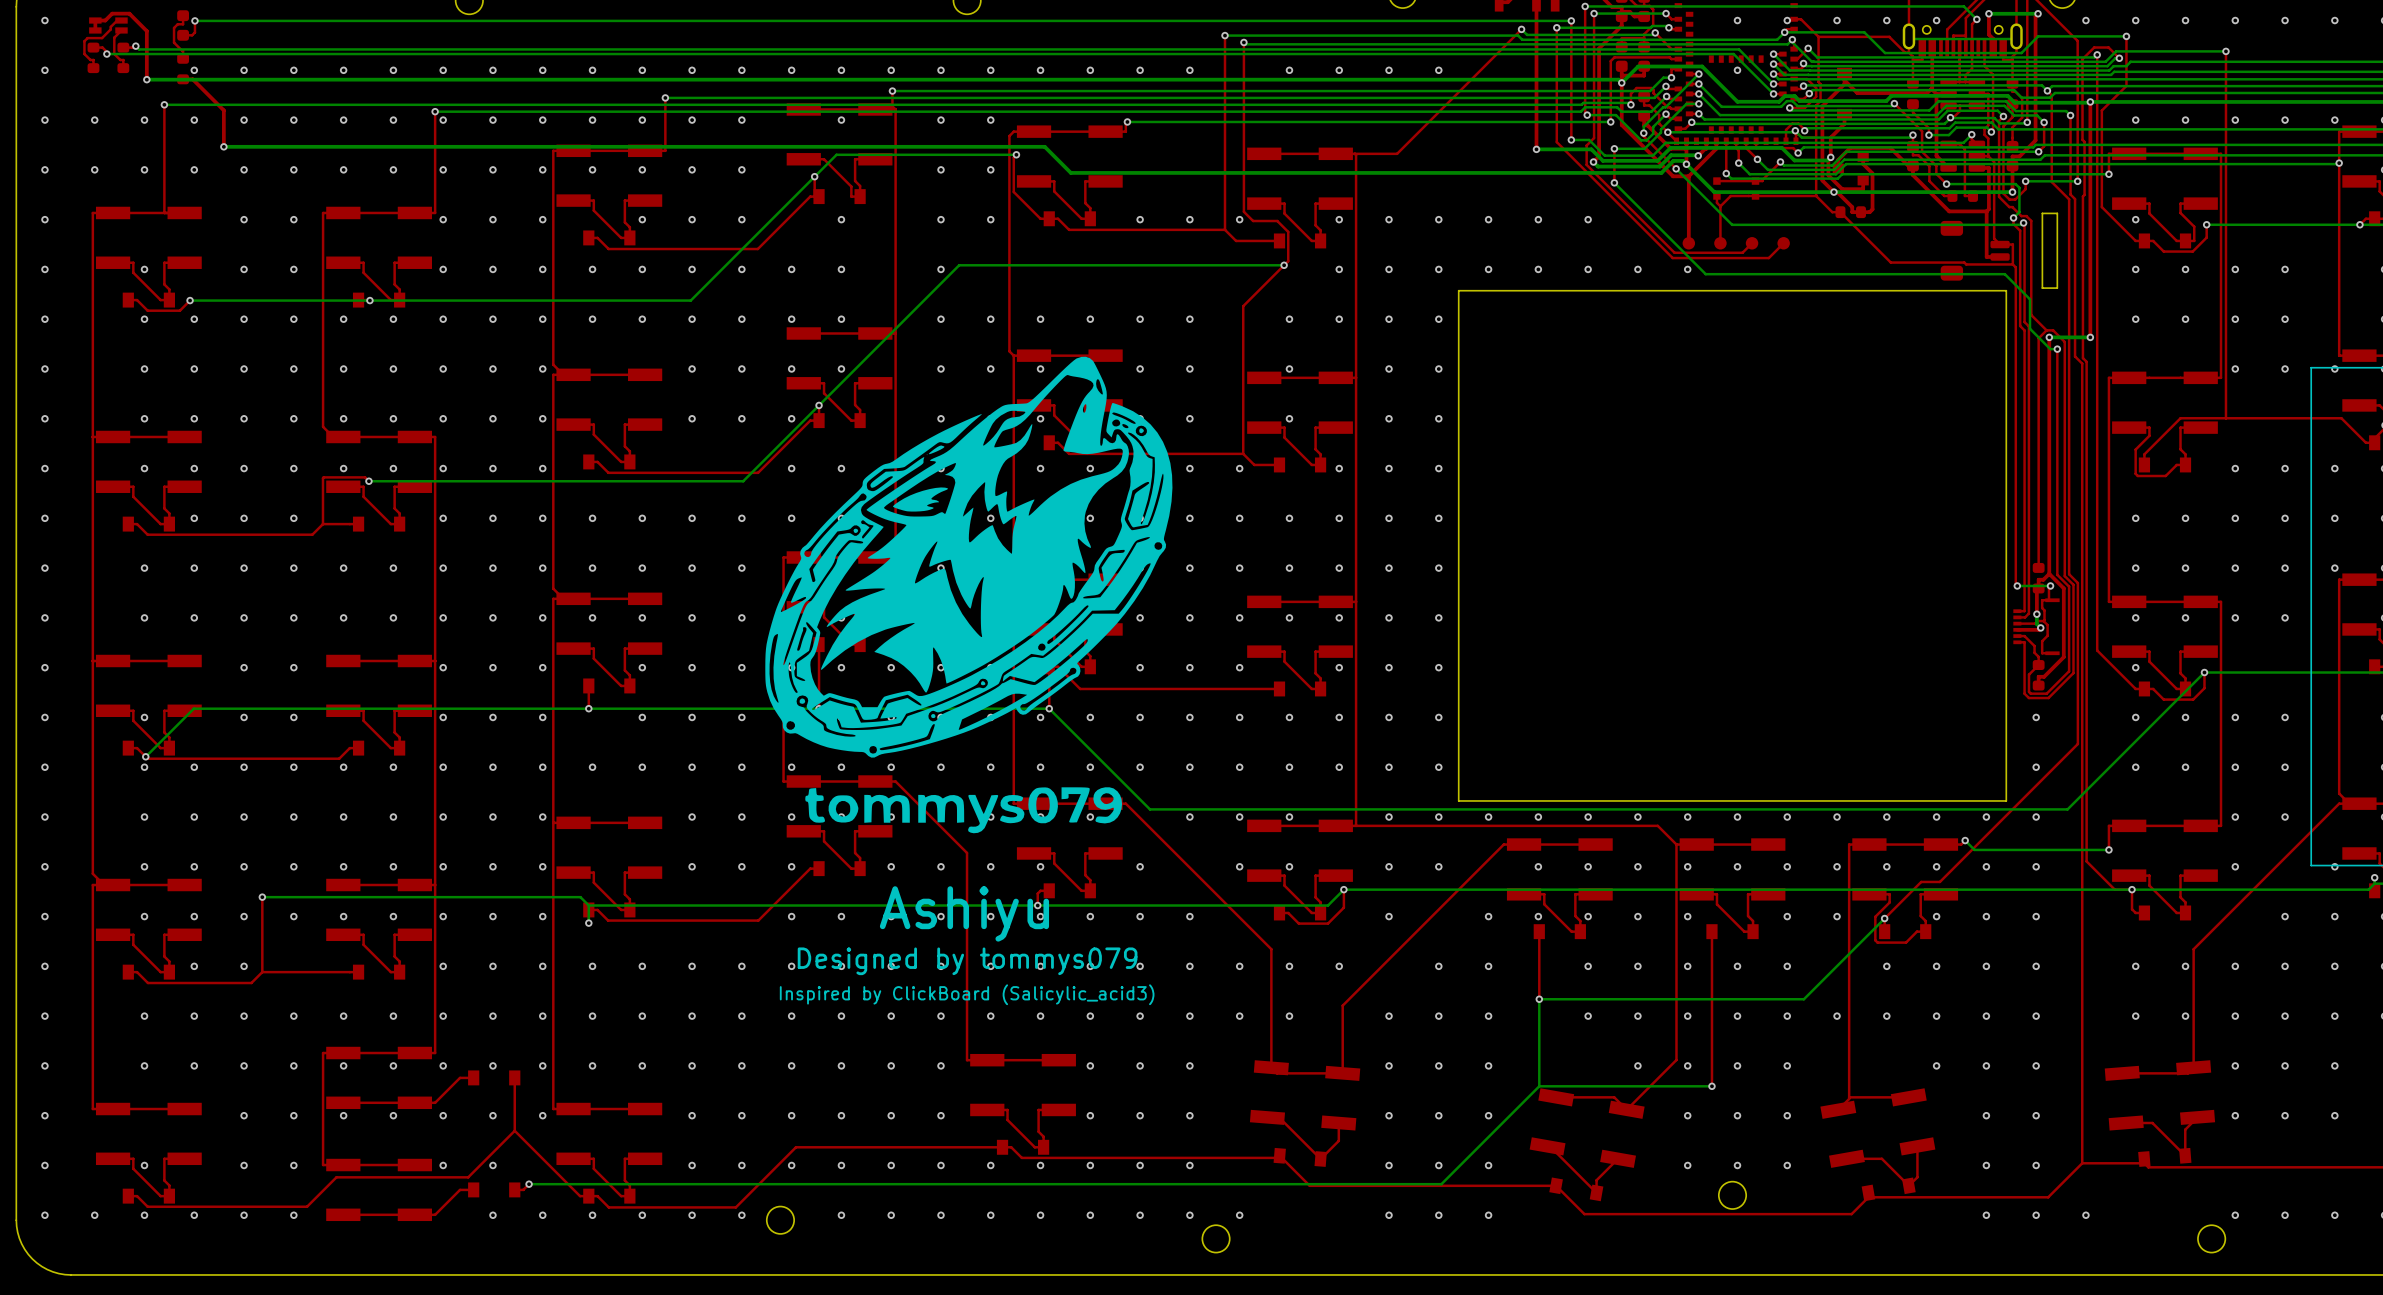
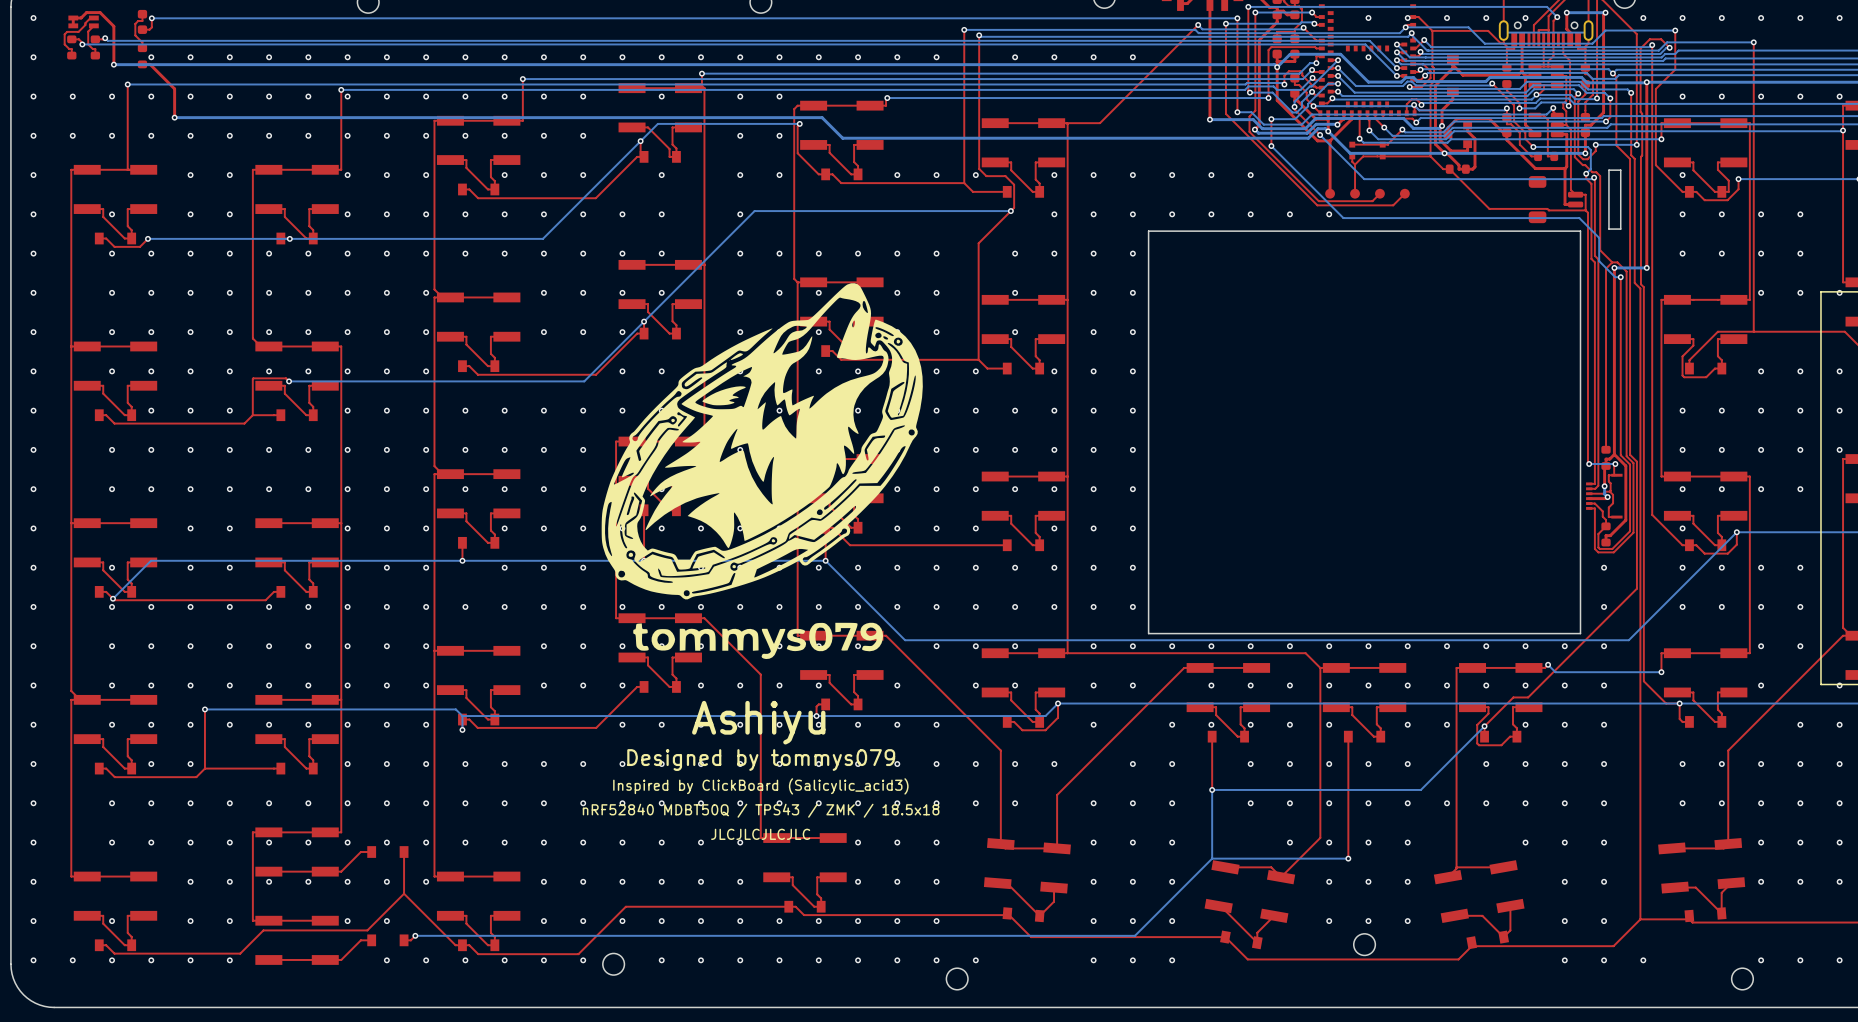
text: none -> nRF52840 MDBT50Q / TPS43 / ZMK / 18.5x18 (761, 810)
text: none -> JLCJLCJLCJLC (760, 834)

